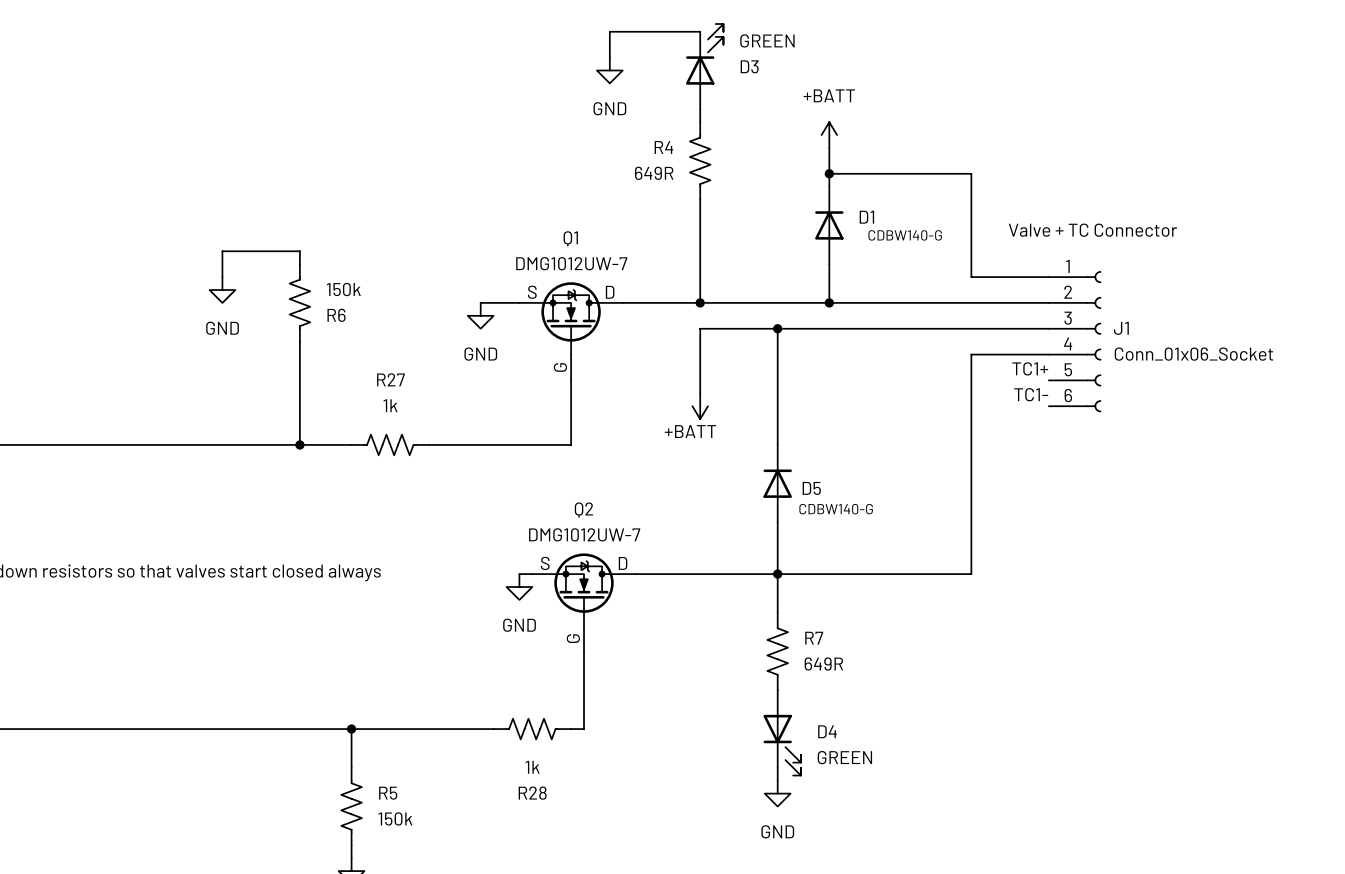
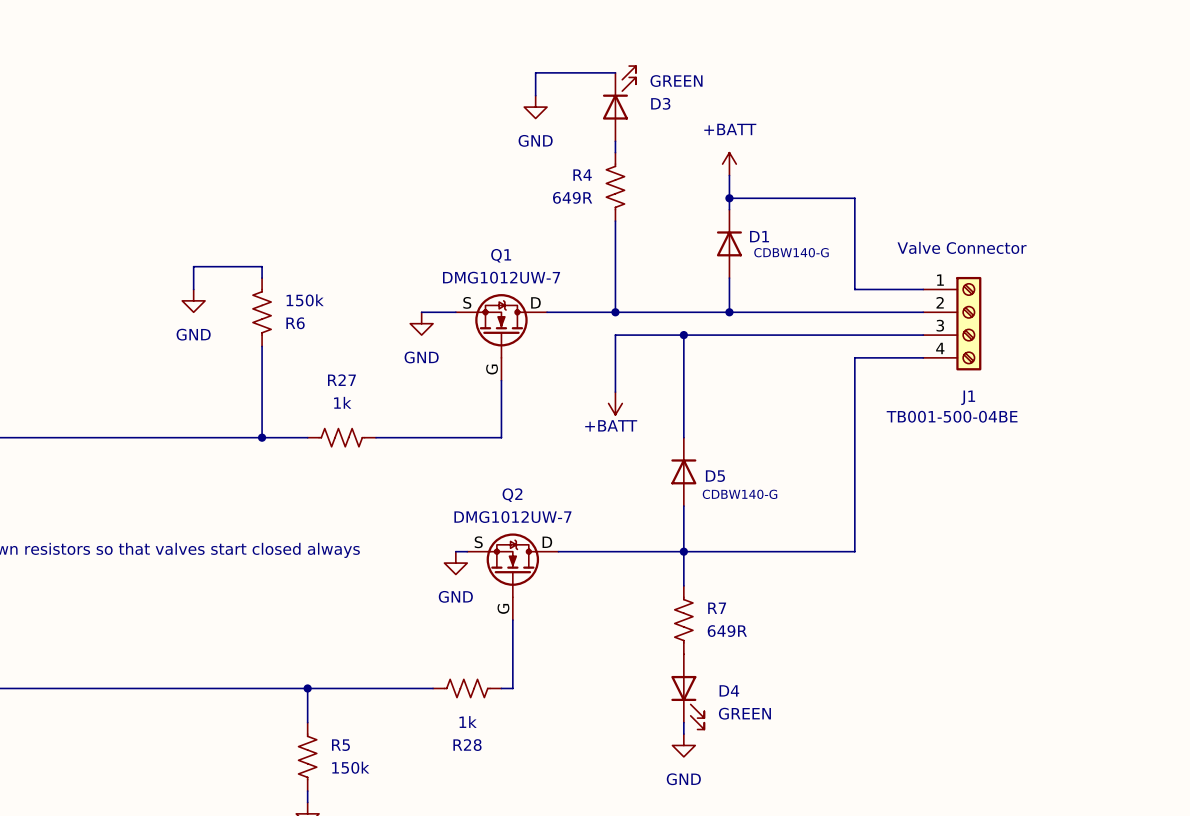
text: Valve + TC Connector (1092, 230) -> Valve Connector (962, 247)
J1 symbol: [1048, 271, 1102, 413] -> [923, 276, 982, 371]
J1 name position: J1 (1121, 328) -> J1 (968, 397)
J1 value: Conn_01x06_Socket (1193, 354) -> TB001-500-04BE (952, 416)
label: TC1+ (1030, 368) -> none
label: TC1- (1031, 394) -> none

